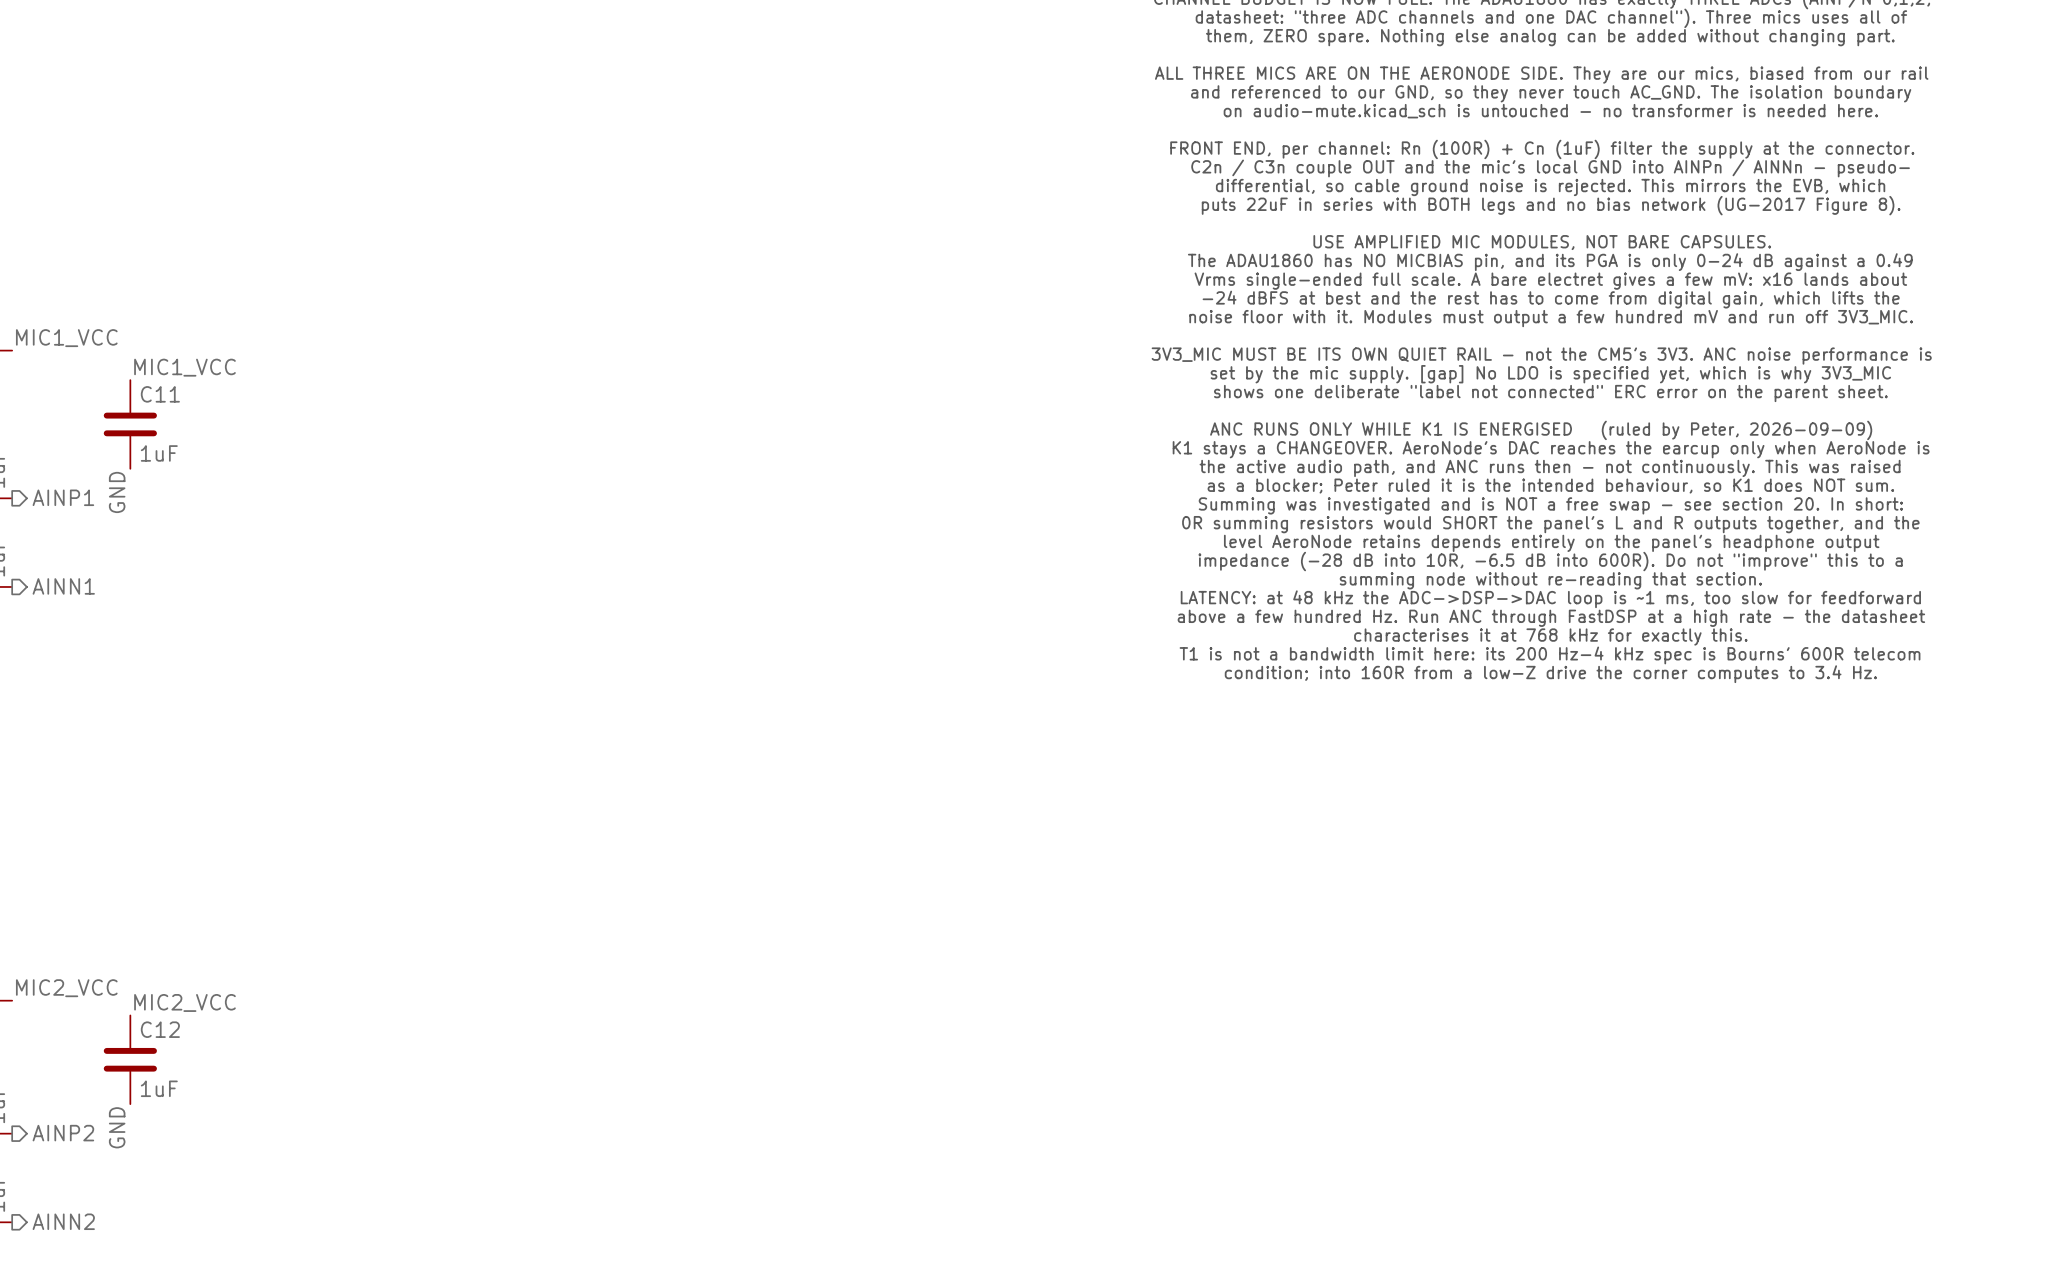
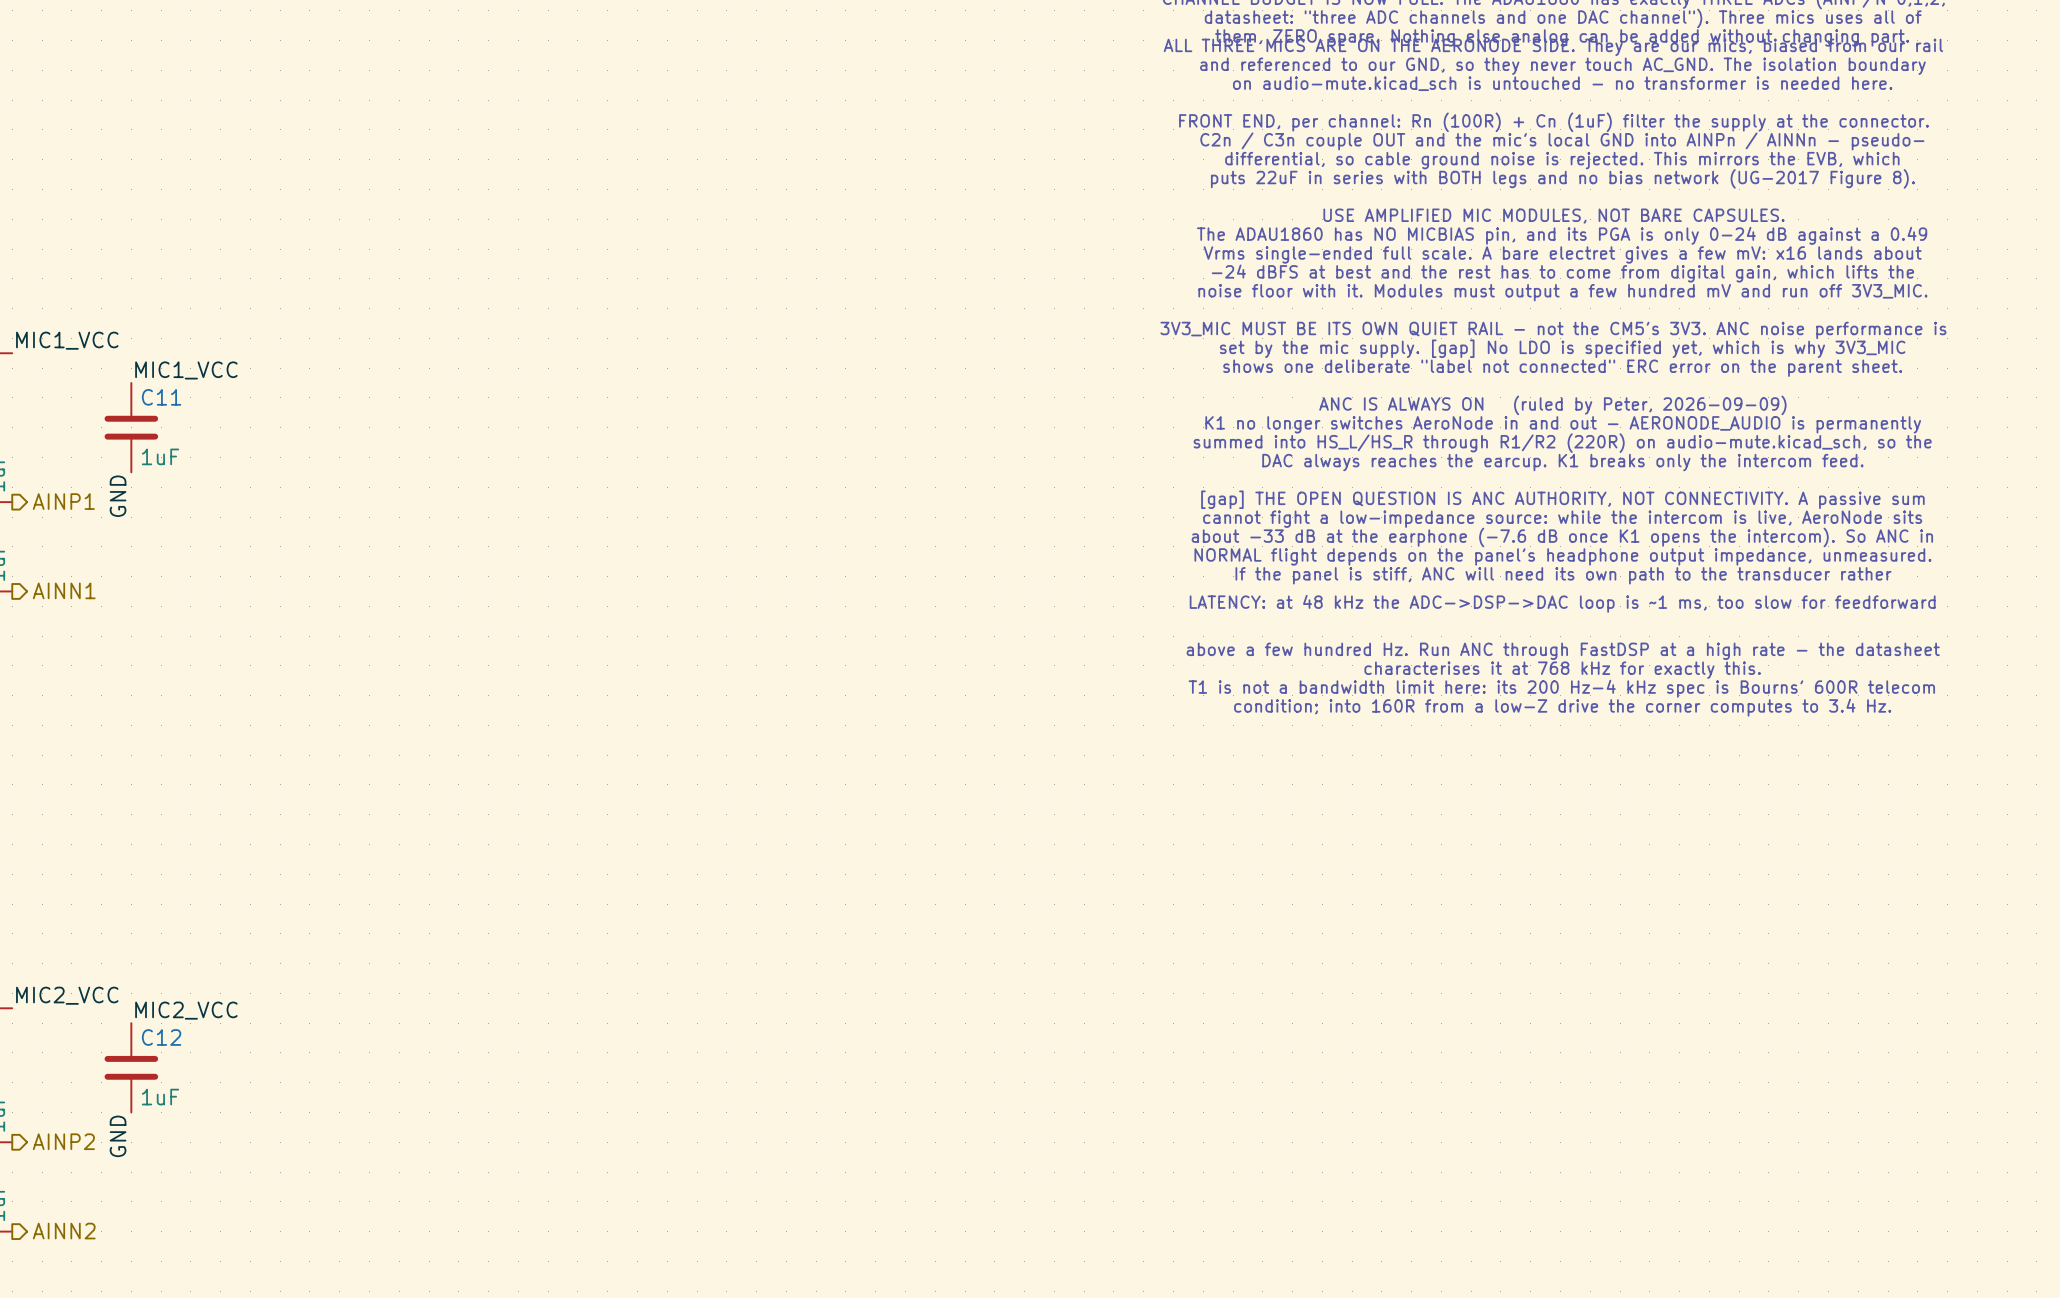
text position: ALL THREE MICS ARE ON THE AERONODE SIDE. They are our mics, biased from our rail (1541, 75) -> ALL THREE MICS ARE ON THE AERONODE SIDE. They are our mics, biased from our rail (1553, 47)
text position: and referenced to our GND, so they never touch AC_GND. The isolation boundary (1551, 93) -> and referenced to our GND, so they never touch AC_GND. The isolation boundary (1562, 66)
text position: on audio-mute.kicad_sch is untouched - no transformer is needed here. (1550, 111) -> on audio-mute.kicad_sch is untouched - no transformer is needed here. (1562, 83)
text position: FRONT END, per channel: Rn (100R) + Cn (1uF) filter the supply at the connector. (1542, 149) -> FRONT END, per channel: Rn (100R) + Cn (1uF) filter the supply at the connector. (1554, 122)
text position: C2n / C3n couple OUT and the mic's local GND into AINPn / AINNn - pseudo- (1550, 168) -> C2n / C3n couple OUT and the mic's local GND into AINPn / AINNn - pseudo- (1562, 141)
text position: differential, so cable ground noise is rejected. This mirrors the EVB, which (1550, 187) -> differential, so cable ground noise is rejected. This mirrors the EVB, which (1562, 160)
text position: puts 22uF in series with BOTH legs and no bias network (UG-2017 Figure 8). (1551, 205) -> puts 22uF in series with BOTH legs and no bias network (UG-2017 Figure 8). (1562, 178)
text position: USE AMPLIFIED MIC MODULES, NOT BARE CAPSULES. (1542, 242) -> USE AMPLIFIED MIC MODULES, NOT BARE CAPSULES. (1554, 216)
text position: The ADAU1860 has NO MICBIAS pin, and its PGA is only 0-24 dB against a 0.49 (1550, 262) -> The ADAU1860 has NO MICBIAS pin, and its PGA is only 0-24 dB against a 0.49 (1562, 235)
text position: Vrms single-ended full scale. A bare electret gives a few mV: x16 lands about (1550, 281) -> Vrms single-ended full scale. A bare electret gives a few mV: x16 lands about (1562, 254)
text position: -24 dBFS at best and the rest has to come from digital gain, which lifts the (1551, 299) -> -24 dBFS at best and the rest has to come from digital gain, which lifts the (1562, 273)
text position: noise floor with it. Modules must output a few hundred mV and run off 3V3_MIC. (1551, 318) -> noise floor with it. Modules must output a few hundred mV and run off 3V3_MIC. (1562, 292)
text position: 3V3_MIC MUST BE ITS OWN QUIET RAIL - not the CM5's 3V3. ANC noise performance is (1541, 356) -> 3V3_MIC MUST BE ITS OWN QUIET RAIL - not the CM5's 3V3. ANC noise performance is (1553, 330)
text position: set by the mic supply. [gap] No LDO is specified yet, which is why 3V3_MIC (1550, 374) -> set by the mic supply. [gap] No LDO is specified yet, which is why 3V3_MIC (1562, 348)
text position: shows one deliberate "label not connected" ERC error on the parent sheet. (1550, 393) -> shows one deliberate "label not connected" ERC error on the parent sheet. (1562, 368)
text: none -> ANC IS ALWAYS ON (ruled by Peter, 2026-09-09) (1552, 405)
text: none -> K1 no longer switches AeroNode in and out - AERONODE_AUDIO is permanently (1563, 424)
text: ANC RUNS ONLY WHILE K1 IS ENERGISED (ruled by Peter, 2026-09-09) (1541, 430) -> none
text: none -> summed into HS_L/HS_R through R1/R2 (220R) on audio-mute.kicad_sch, so the (1562, 443)
text: K1 stays a CHANGEOVER. AeroNode's DAC reaches the earcup only when AeroNode is (1551, 449) -> none
text: none -> DAC always reaches the earcup. K1 breaks only the intercom feed. (1562, 462)
text: the active audio path, and ANC runs then - not continuously. This was raised (1550, 468) -> none
text: as a blocker; Peter ruled it is the intended behaviour, so K1 does NOT sum. (1550, 486) -> none
text: none -> [gap] THE OPEN QUESTION IS ANC AUTHORITY, NOT CONNECTIVITY. A passive sum (1562, 499)
text: Summing was investigated and is NOT a free swap - see section 20. In short: (1550, 505) -> none
text: none -> cannot fight a low-impedance source: while the intercom is live, AeroNode sits (1562, 519)
text: 0R summing resistors would SHORT the panel's L and R outputs together, and the (1550, 524) -> none
text: none -> about -33 dB at the earphone (-7.6 dB once K1 opens the intercom). So ANC in (1562, 537)
text: level AeroNode retains depends entirely on the panel's headphone output (1551, 543) -> none
text: none -> NORMAL flight depends on the panel's headphone output impedance, unmeasured. (1562, 556)
text: impedance (-28 dB into 10R, -6.5 dB into 600R). Do not "improve" this to a (1550, 561) -> none
text: none -> If the panel is stiff, ANC will need its own path to the transducer rather (1563, 575)
text: summing node without re-reading that section. (1550, 580) -> none
text position: above a few hundred Hz. Run ANC through FastDSP at a high rate - the datasheet (1551, 618) -> above a few hundred Hz. Run ANC through FastDSP at a high rate - the datasheet (1563, 651)
text position: characterises it at 768 kHz for exactly this. (1550, 637) -> characterises it at 768 kHz for exactly this. (1562, 670)
text position: T1 is not a bandwidth limit here: its 200 Hz-4 kHz spec is Bourns' 600R telecom (1550, 655) -> T1 is not a bandwidth limit here: its 200 Hz-4 kHz spec is Bourns' 600R telecom (1561, 688)
text position: condition; into 160R from a low-Z drive the corner computes to 3.4 Hz. (1550, 674) -> condition; into 160R from a low-Z drive the corner computes to 3.4 Hz. (1562, 707)

